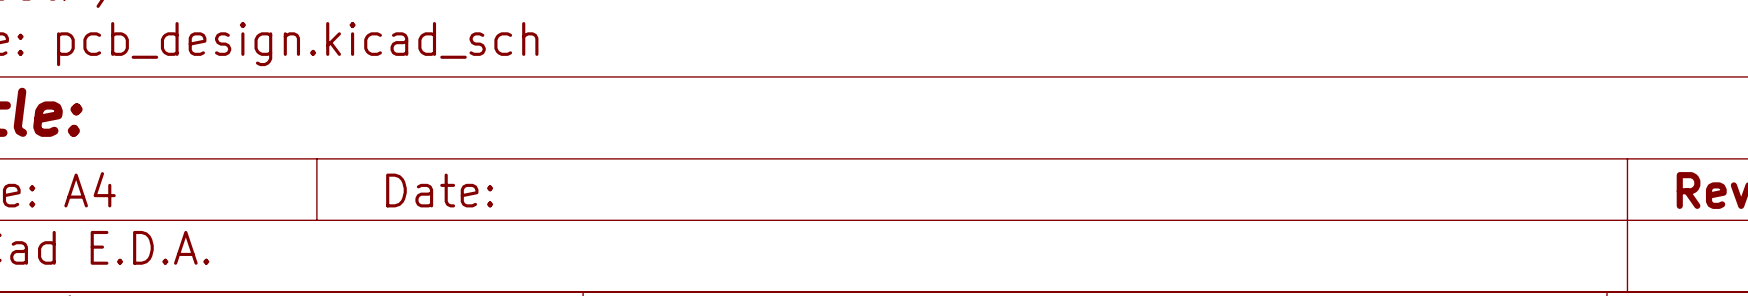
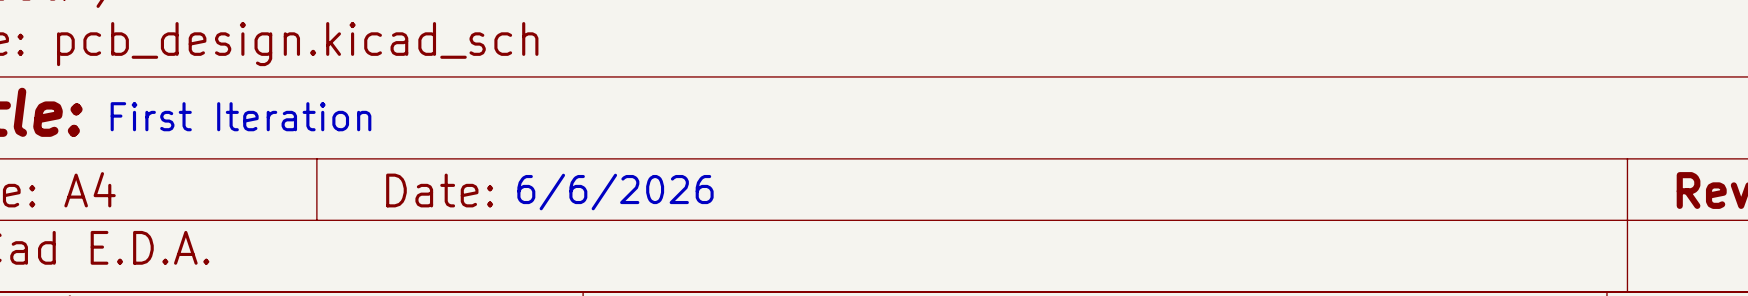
text: none -> First Iteration (241, 116)
text: none -> 6/6/2026 (615, 192)

